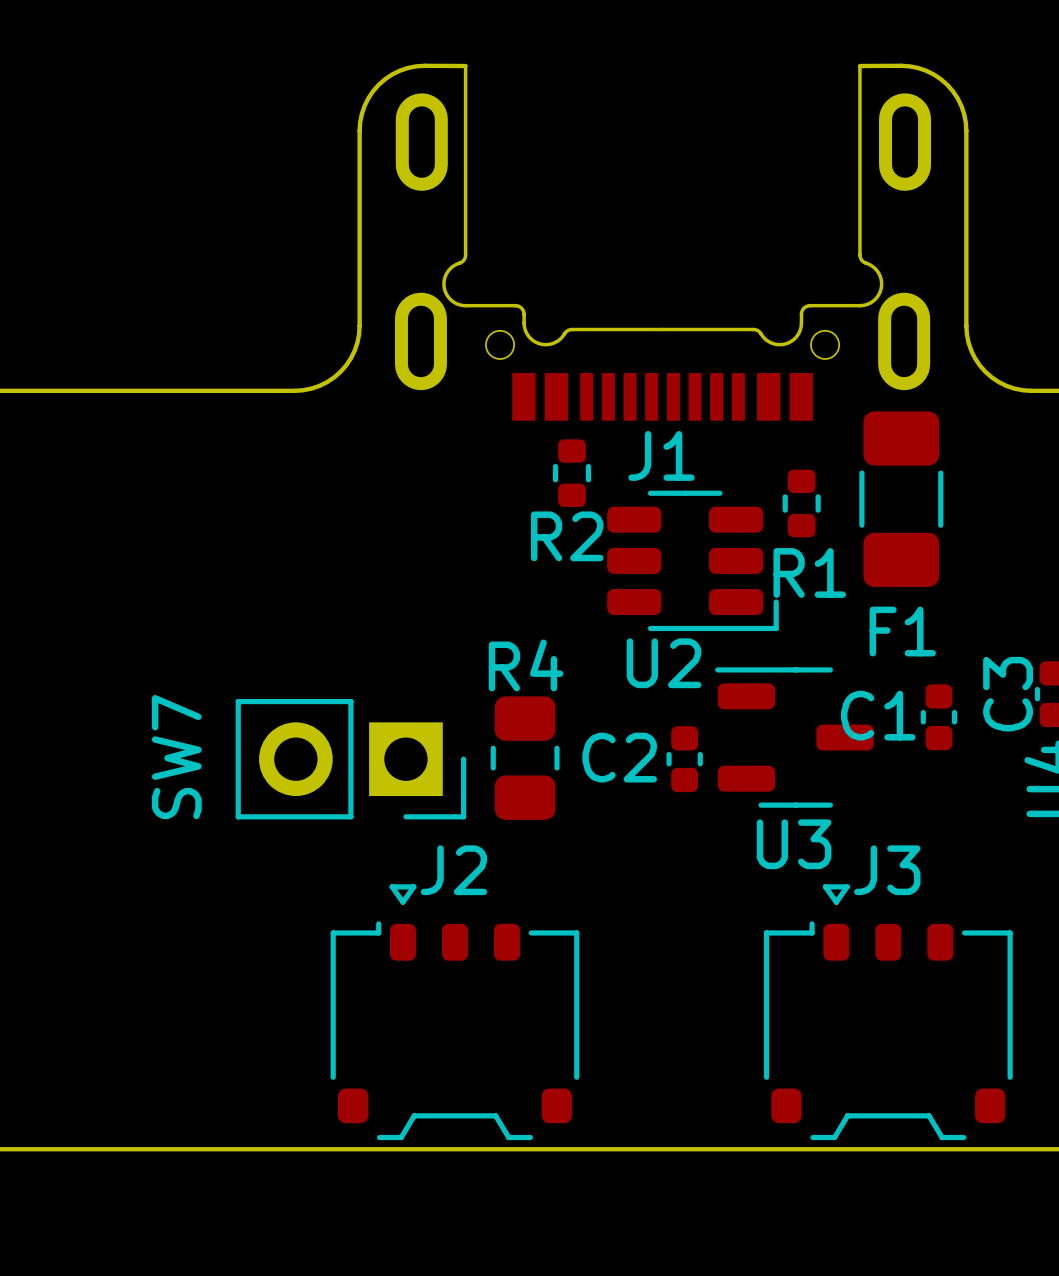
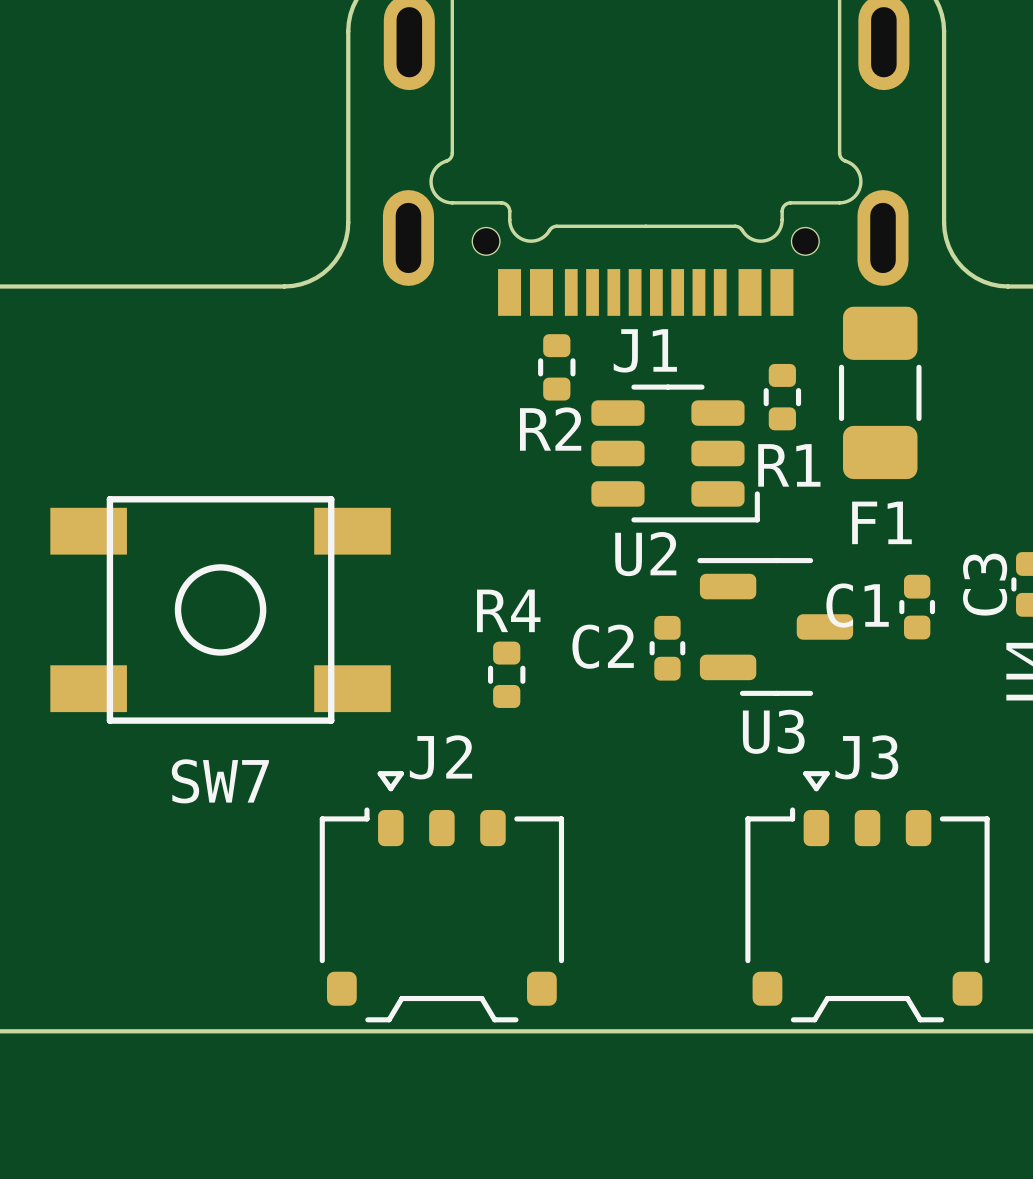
R4 footprint: [490, 696, 560, 820] -> [487, 641, 526, 708]
SW7 footprint: [235, 698, 467, 820] -> [50, 496, 391, 724]
SW7 name position: SW7 (176, 757) -> SW7 (220, 781)

